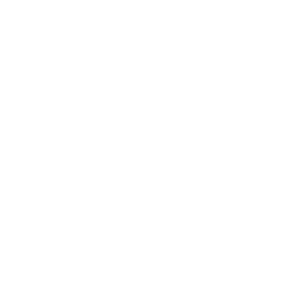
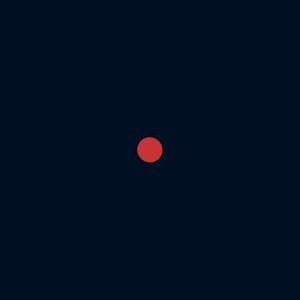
track: none -> (149, 149) (150, 150)

